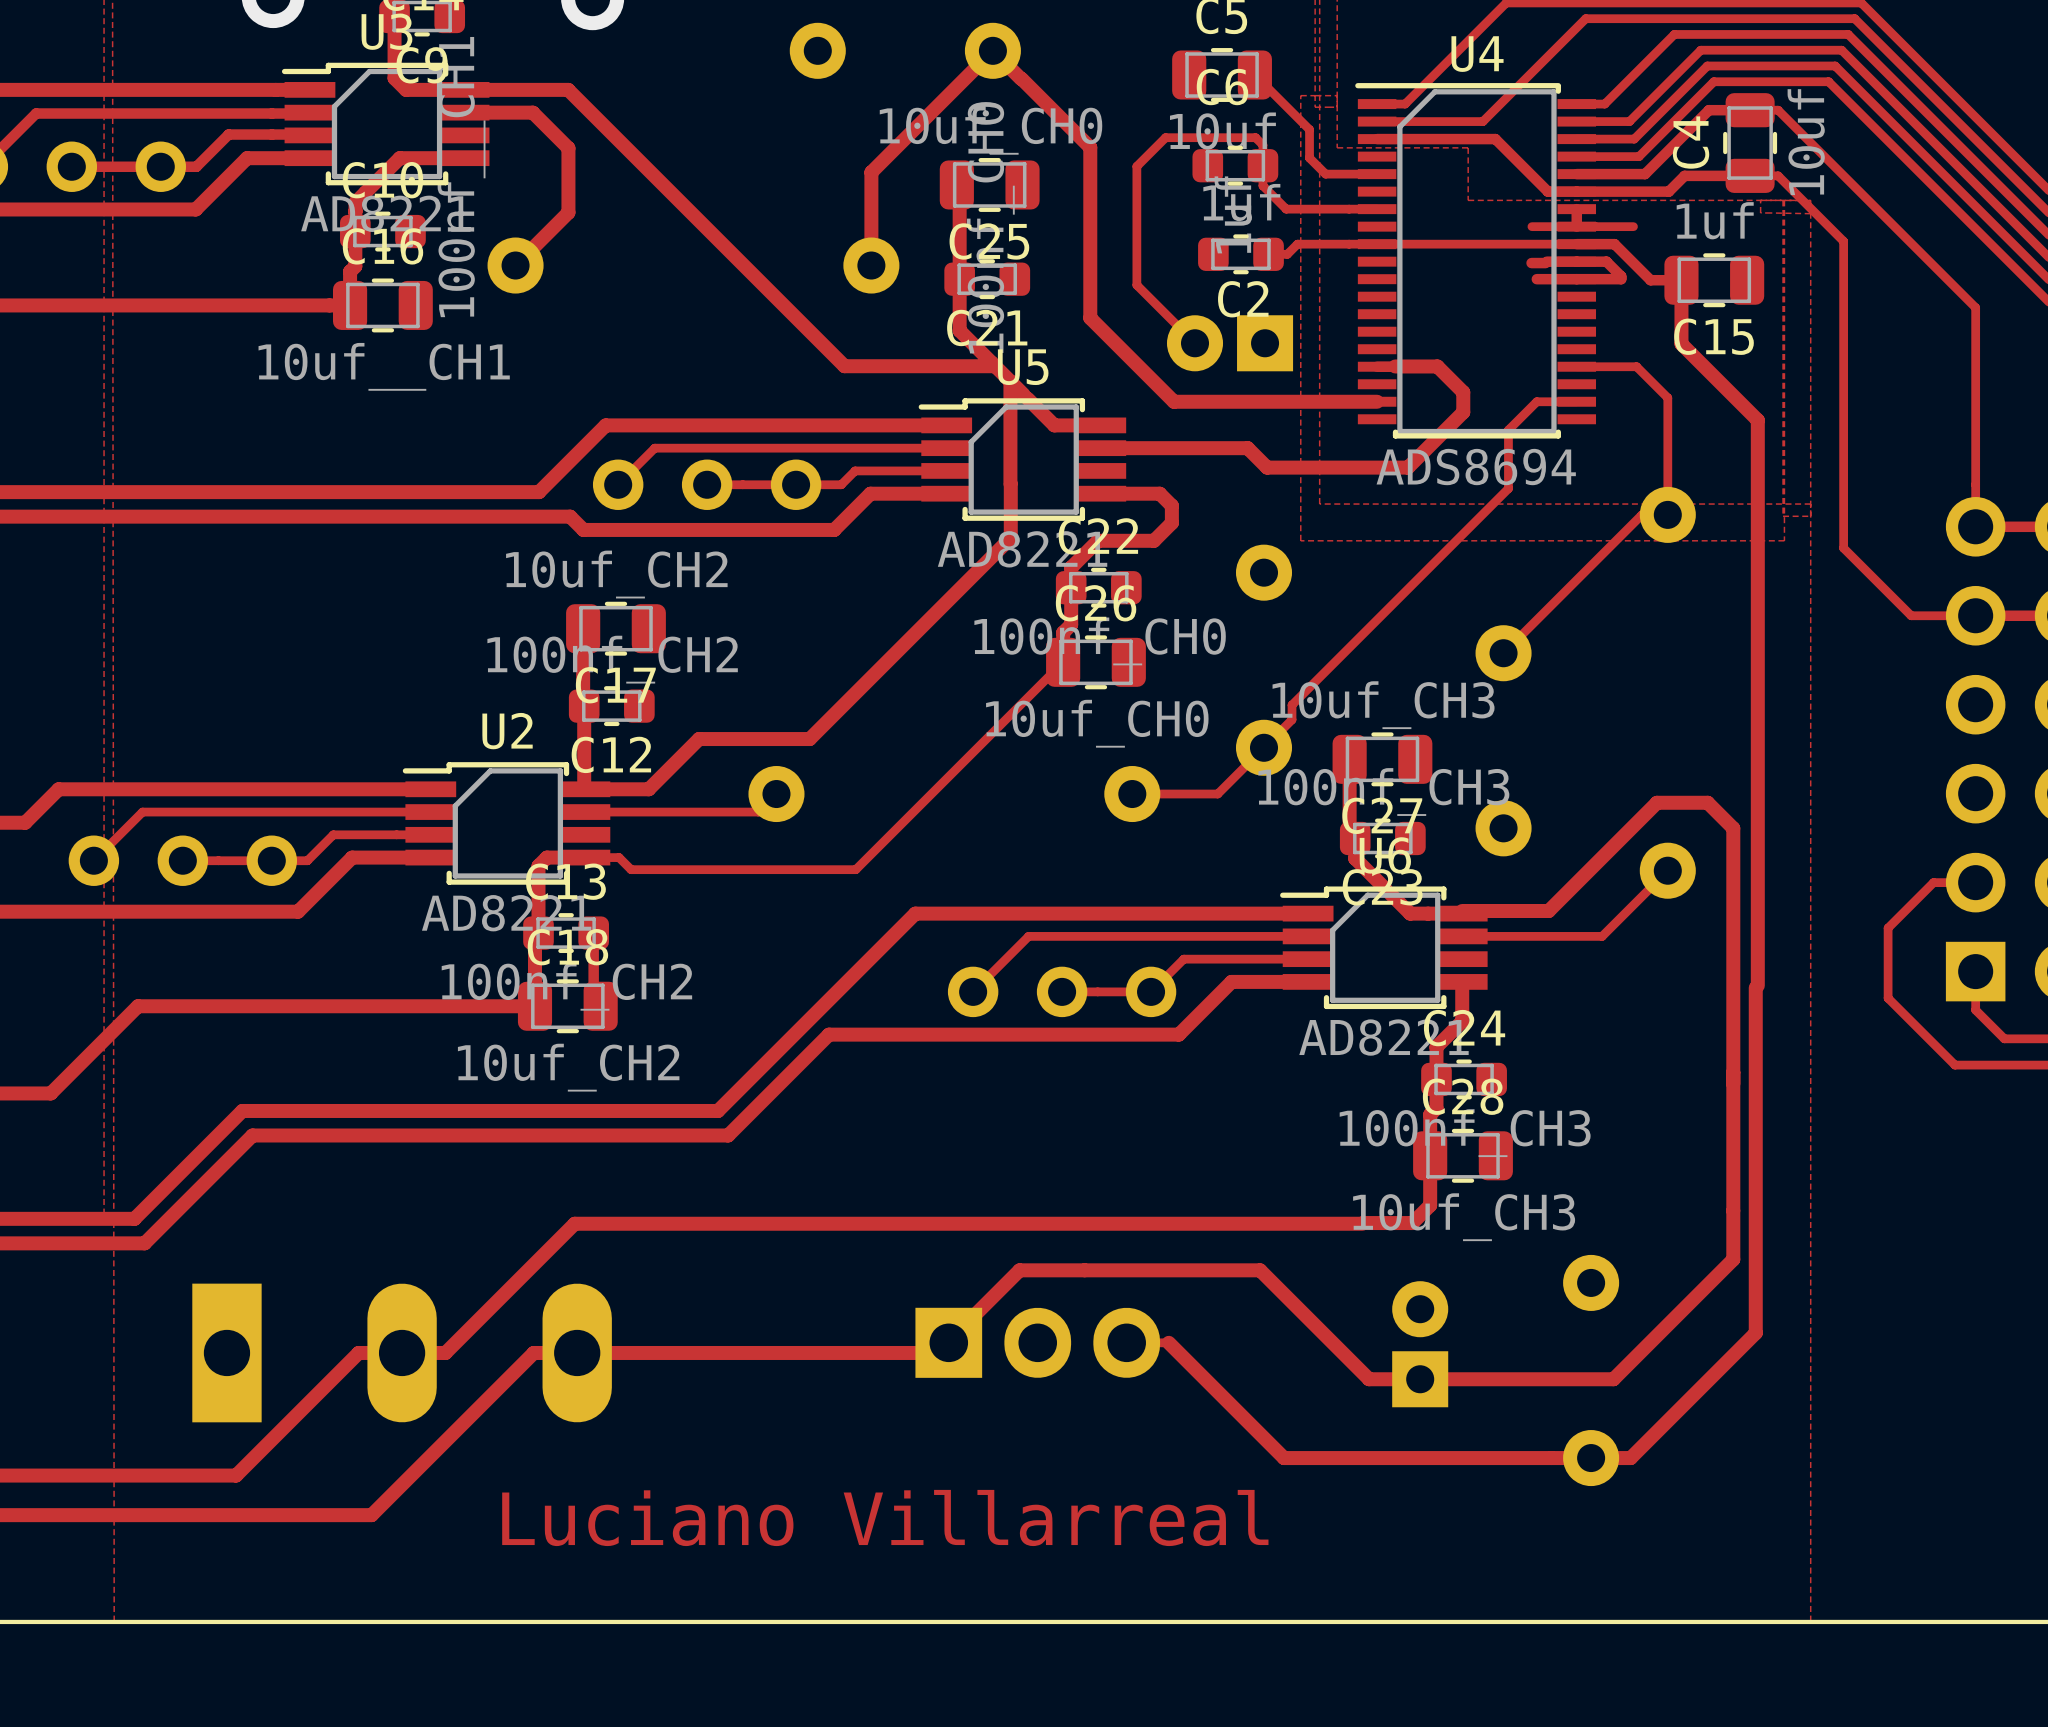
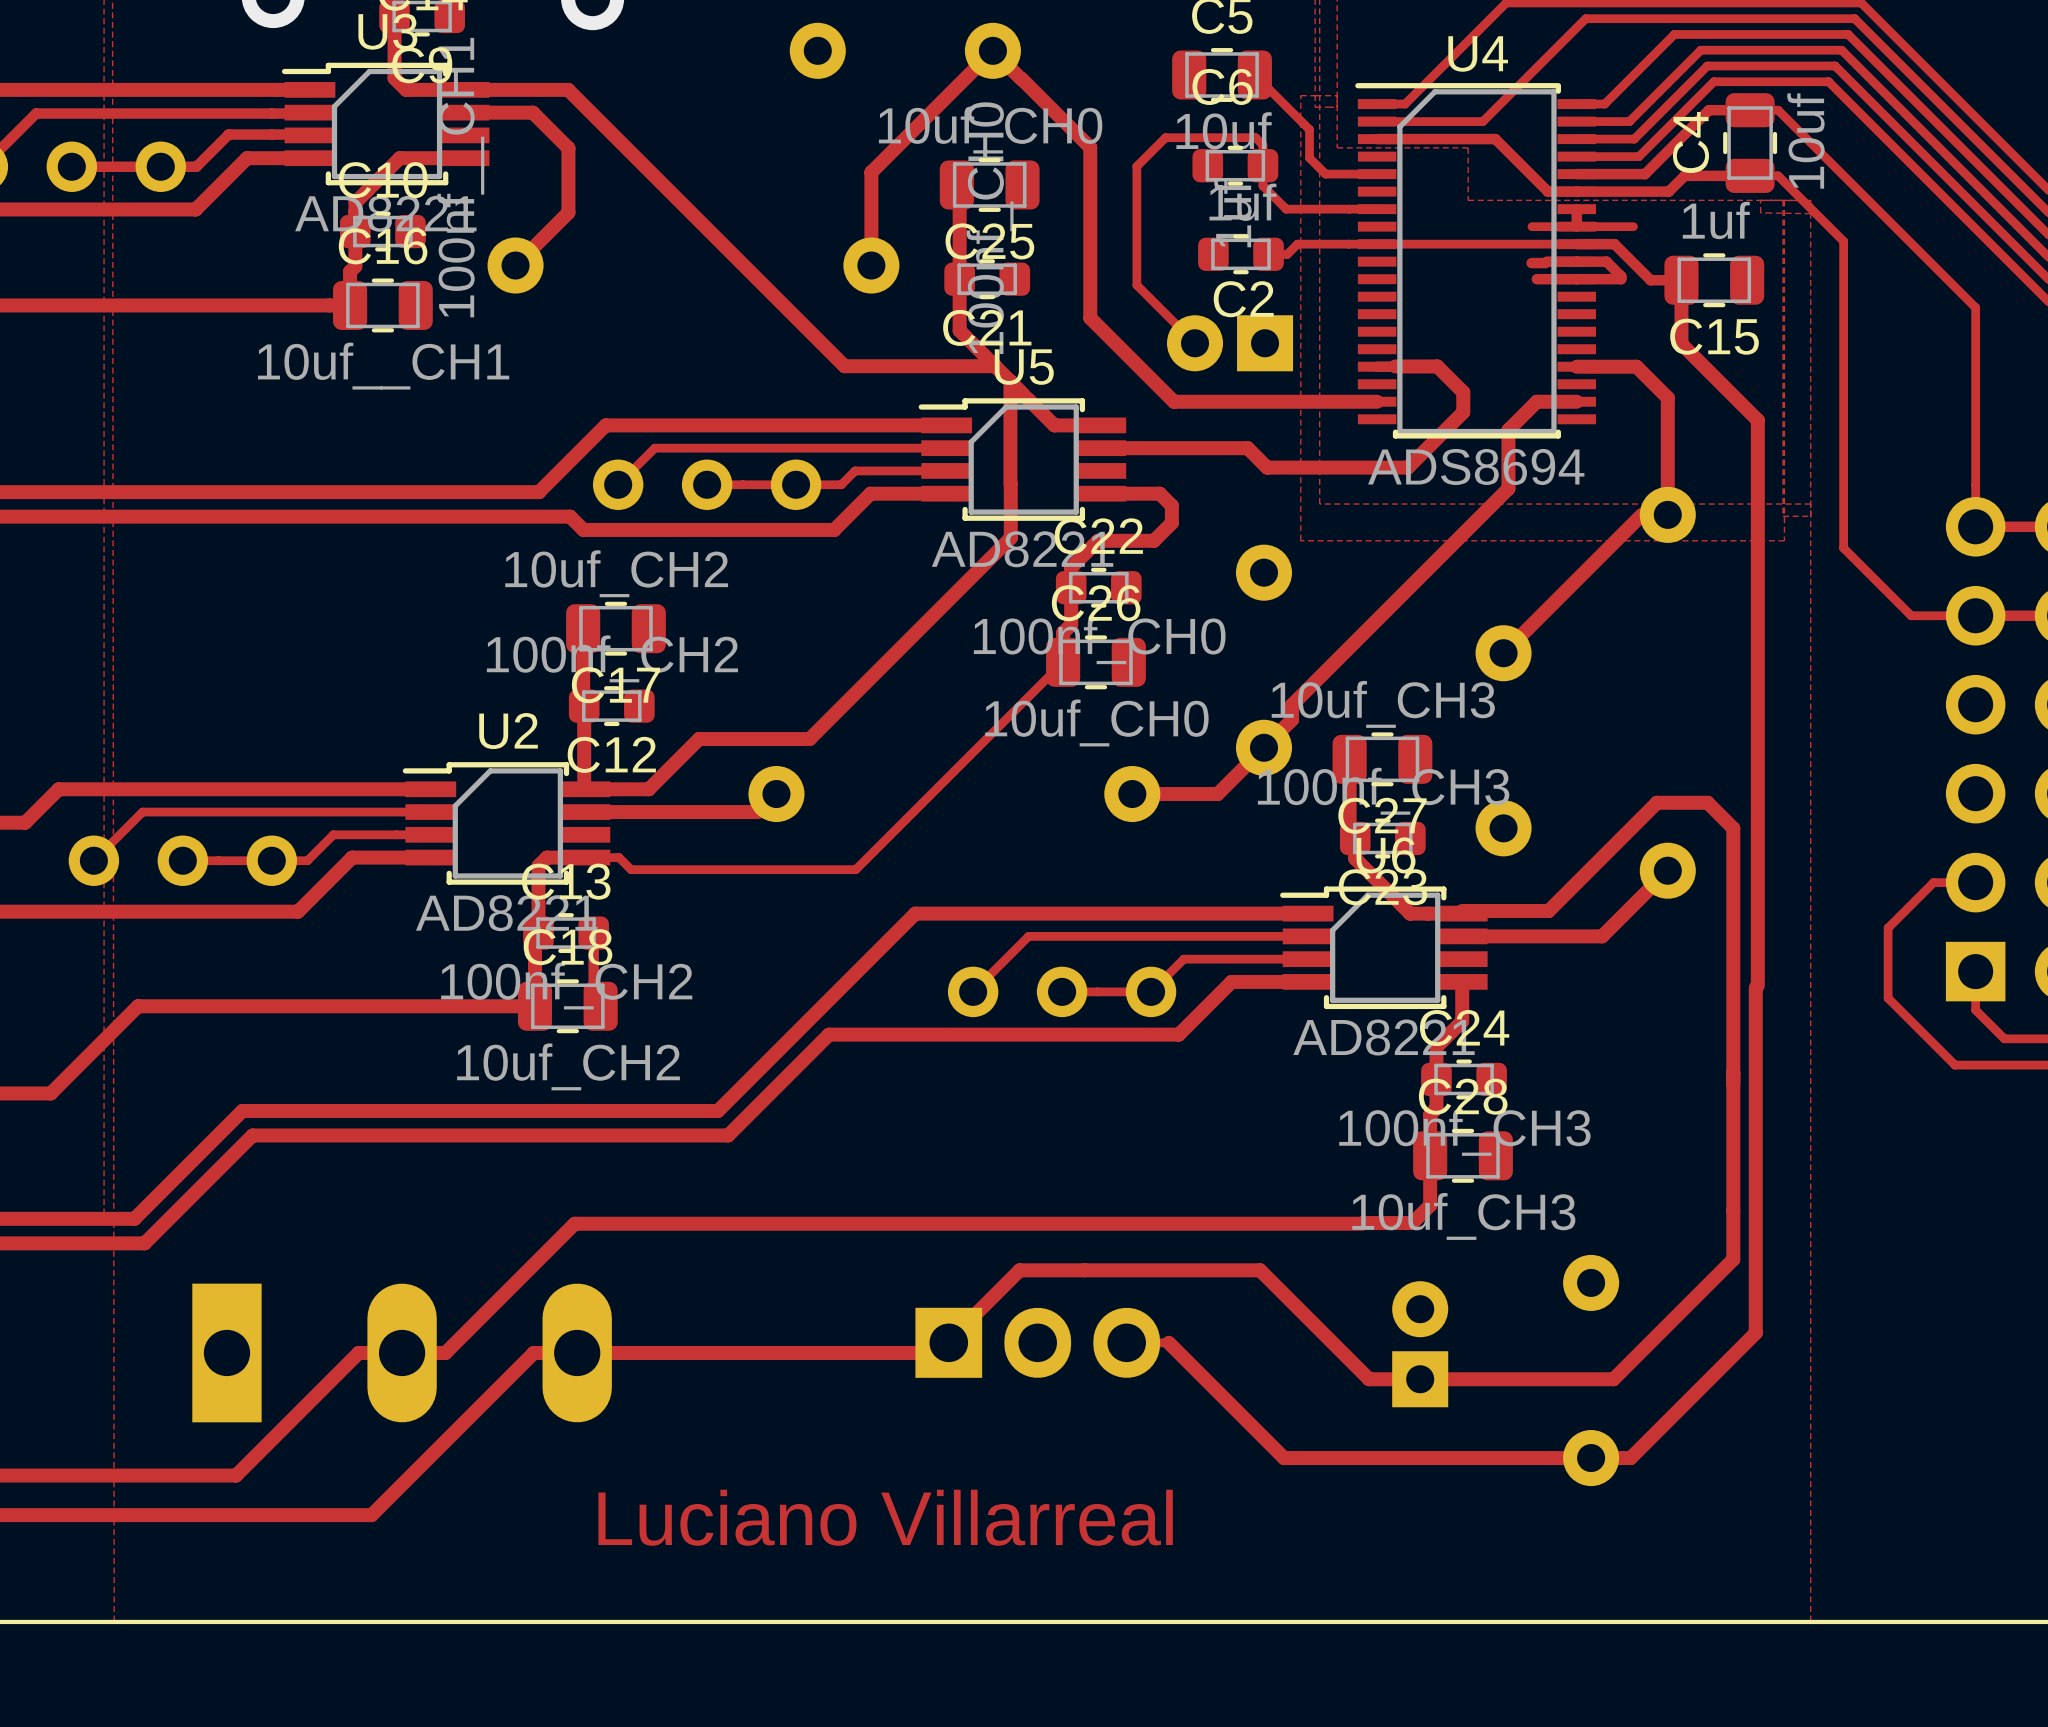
top track width: thin (1576, 366) (1636, 366) (1667, 397) (1667, 514) -> thick (1576, 366) (1636, 366) (1667, 397) (1667, 514)
top track width: thin (1576, 401) (1536, 401) (1508, 430) (1508, 488) (1292, 705) (1292, 719) (1217, 794) (1132, 794) -> thick (1576, 401) (1536, 401) (1508, 430) (1508, 488) (1292, 705) (1292, 719) (1217, 794) (1132, 794)
top track width: thin (1641, 514) (1503, 653) -> thick (1641, 514) (1503, 653)
top track width: thin (584, 812) (758, 812) -> thick (584, 812) (758, 812)
top track width: thin (1667, 870) (1602, 936) (1462, 936) -> thick (1667, 870) (1602, 936) (1462, 936)

